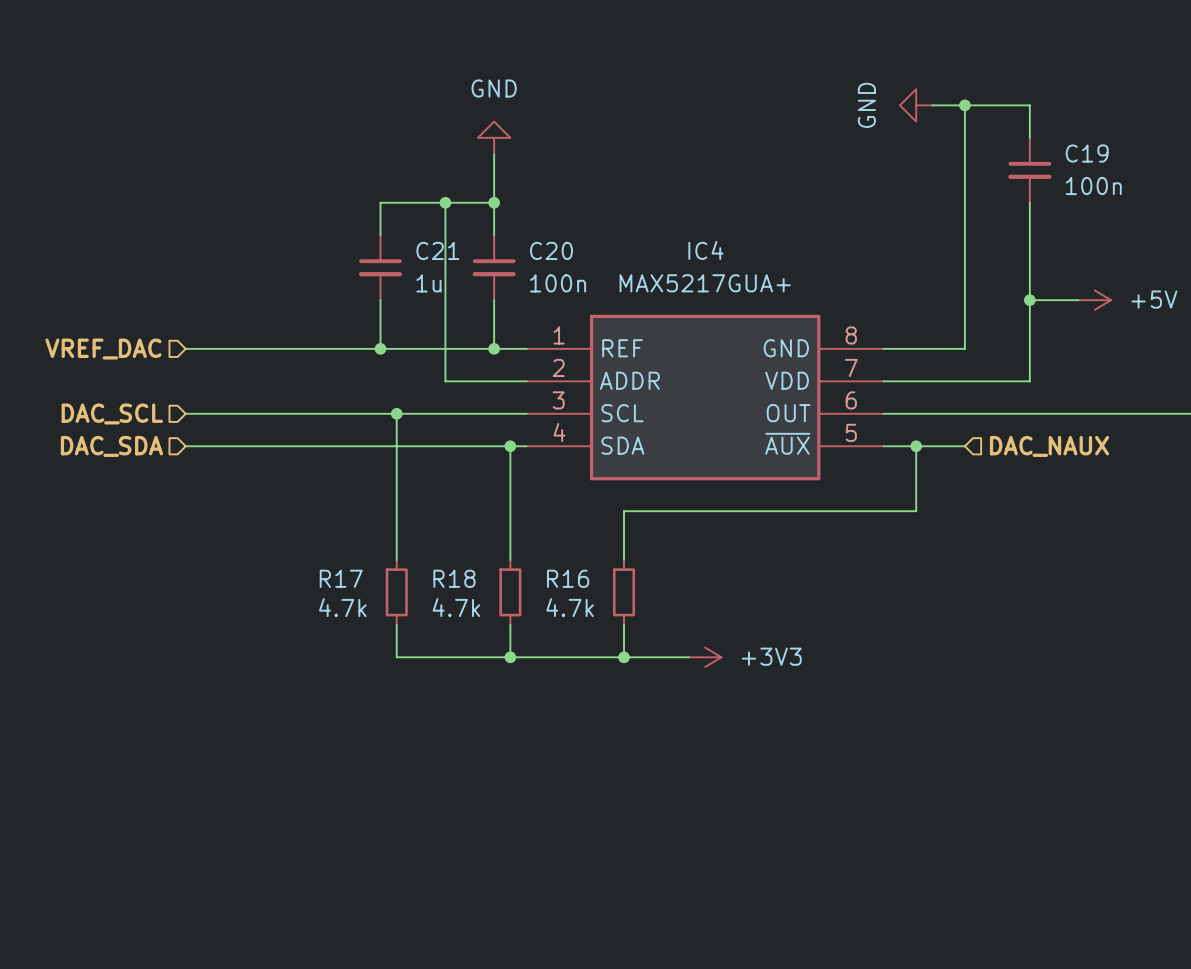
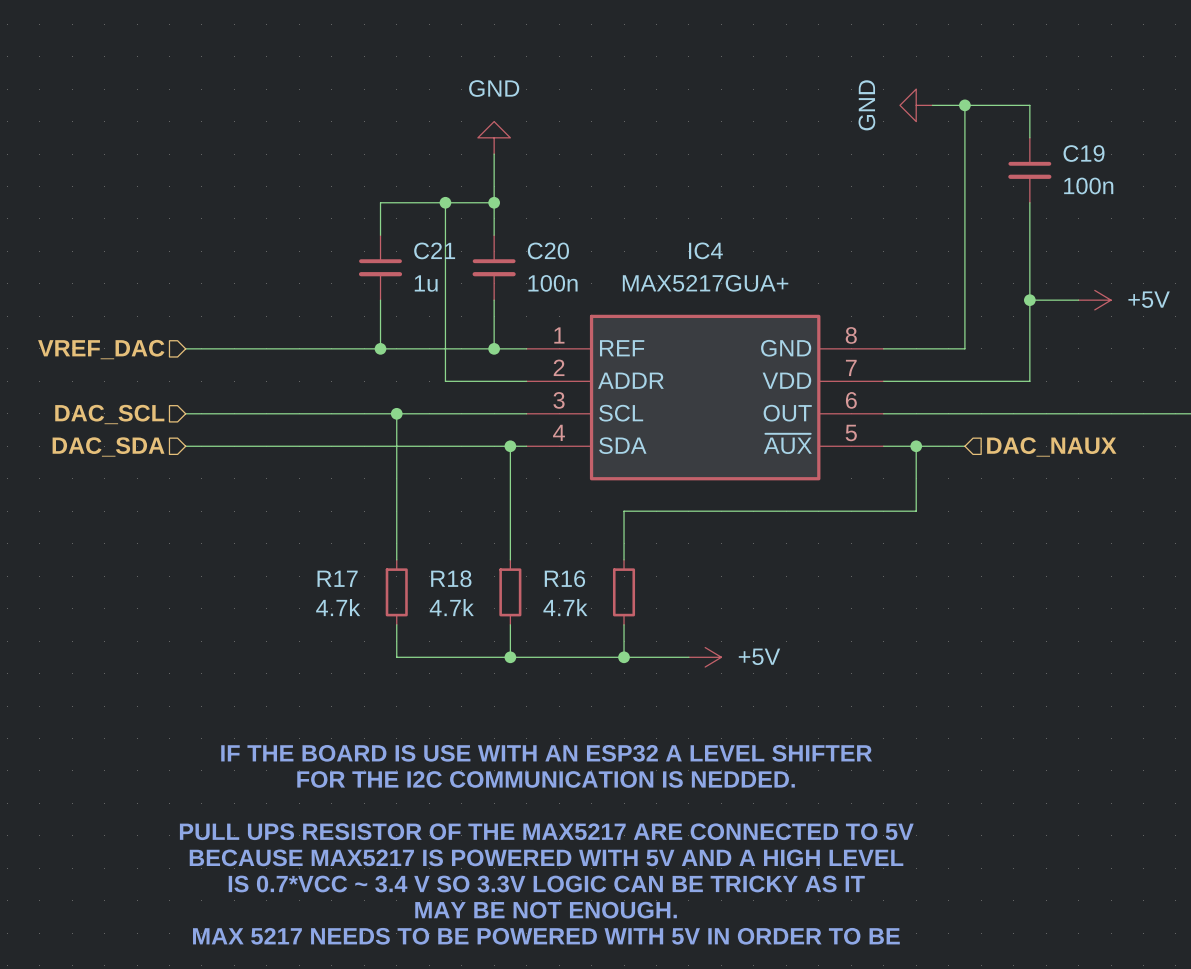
power symbol: +3V3 (705, 657) -> +5V (705, 657)
text: none -> IF THE BOARD IS USE WITH AN ESP32 A LEVEL SHIFTER (546, 753)
text: none -> FOR THE I2C COMMUNICATION IS NEDDED. (546, 779)
text: none -> PULL UPS RESISTOR OF THE MAX5217 ARE CONNECTED TO 5V (546, 831)
text: none -> BECAUSE MAX5217 IS POWERED WITH 5V AND A HIGH LEVEL (546, 857)
text: none -> IS 0.7*VCC ~ 3.4 V SO 3.3V LOGIC CAN BE TRICKY AS IT (546, 884)
text: none -> MAY BE NOT ENOUGH. (546, 910)
text: none -> MAX 5217 NEEDS TO BE POWERED WITH 5V IN ORDER TO BE (546, 936)

